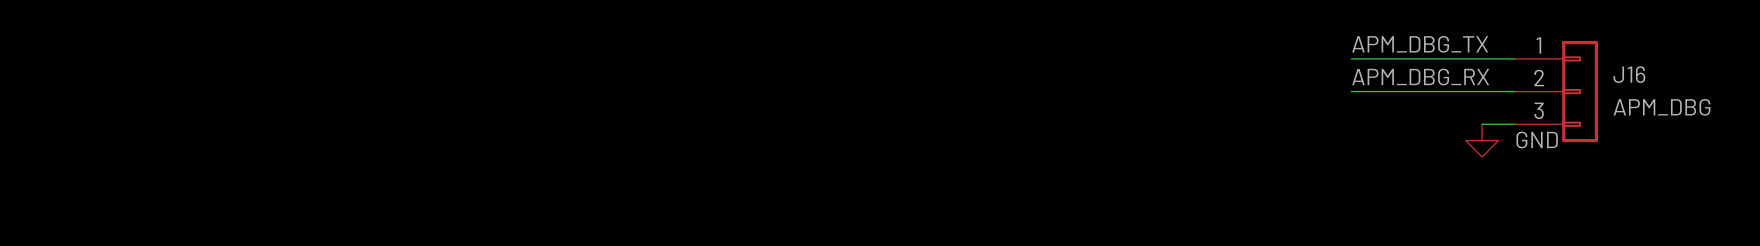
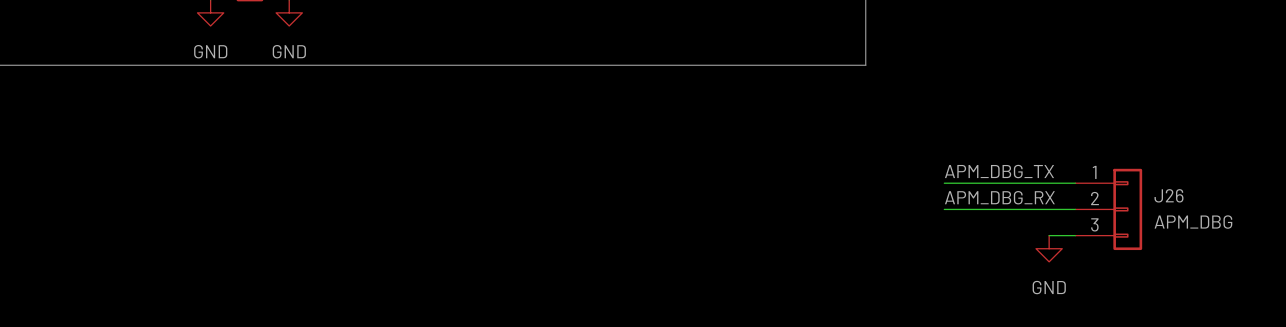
J16 name: J16 (1629, 74) -> J26 (1168, 195)
power symbol text position: GND (1537, 139) -> GND (1049, 287)

